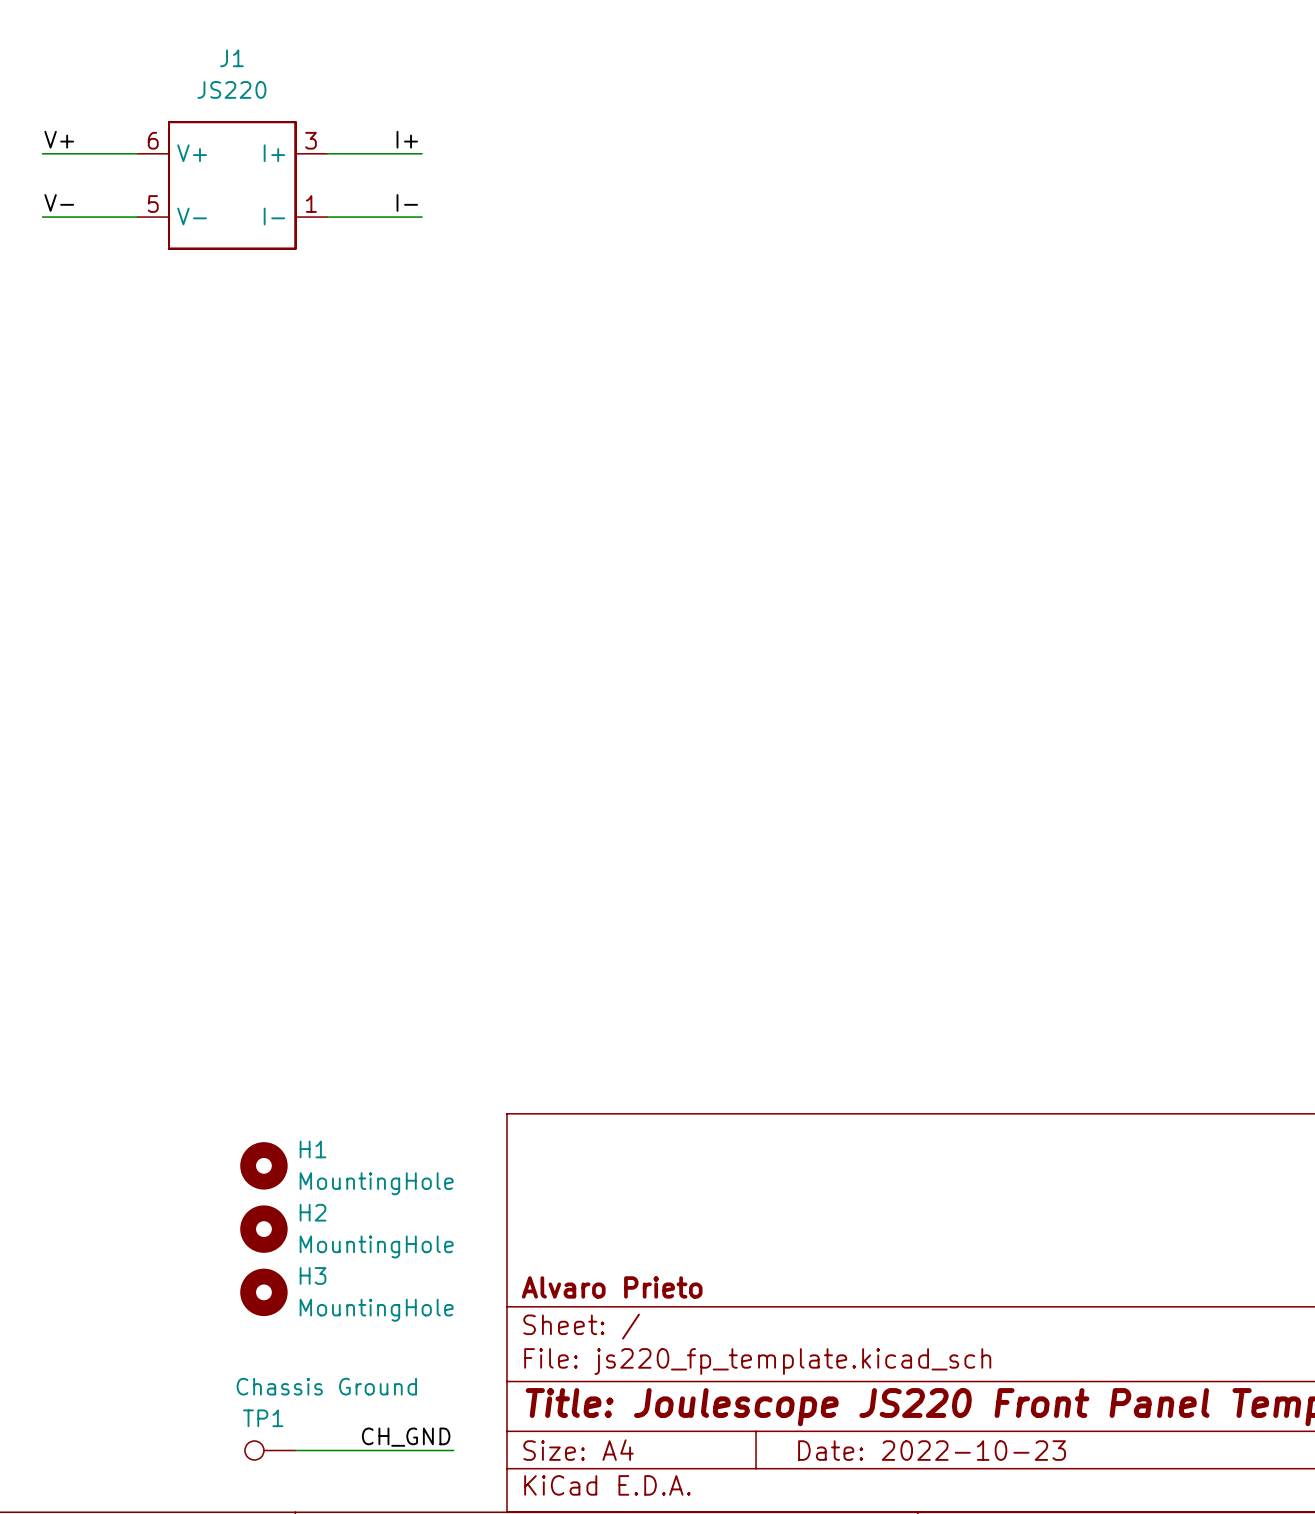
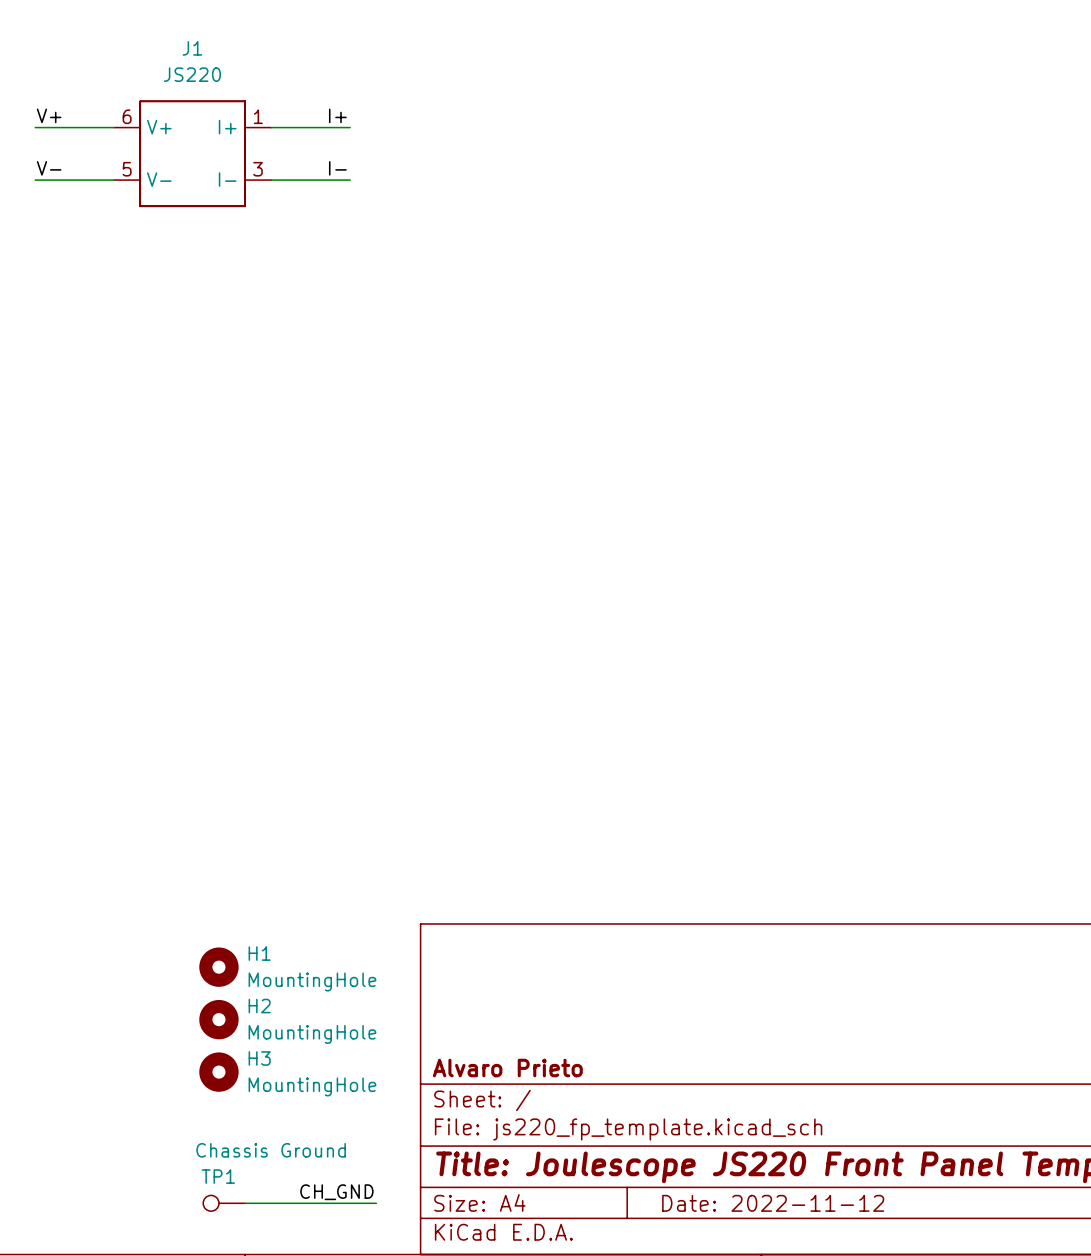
J1 pin number: 3 (311, 140) -> 1 (258, 116)
J1 pin number: 1 (311, 204) -> 3 (258, 169)
title block: Date: 2022-10-23 (932, 1450) -> Date: 2022-11-12 (773, 1203)

